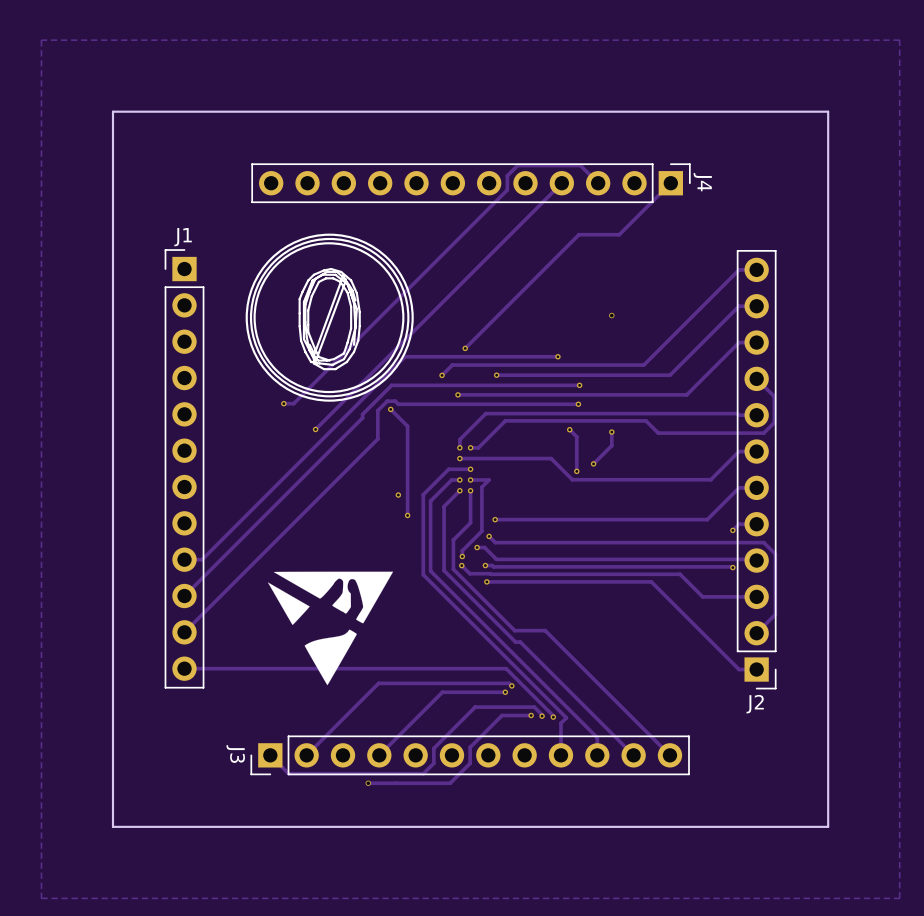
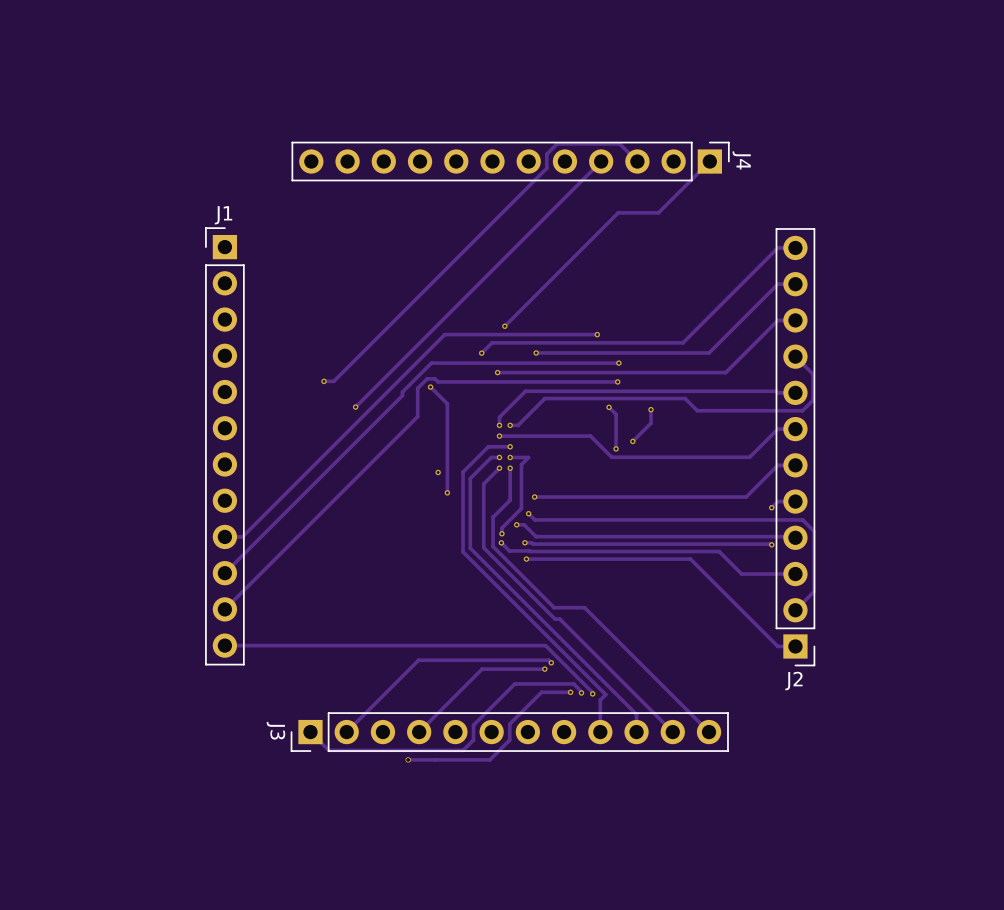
zone outline: (899, 40) (41, 40) (41, 898) (899, 898) (899, 40) -> none
board edge: (828, 111) (828, 826) (112, 826) (112, 111) (828, 111) -> none
drawing: [245, 233, 414, 402] -> none
via: (611, 315) -> none
drawing: [268, 571, 394, 686] -> none

